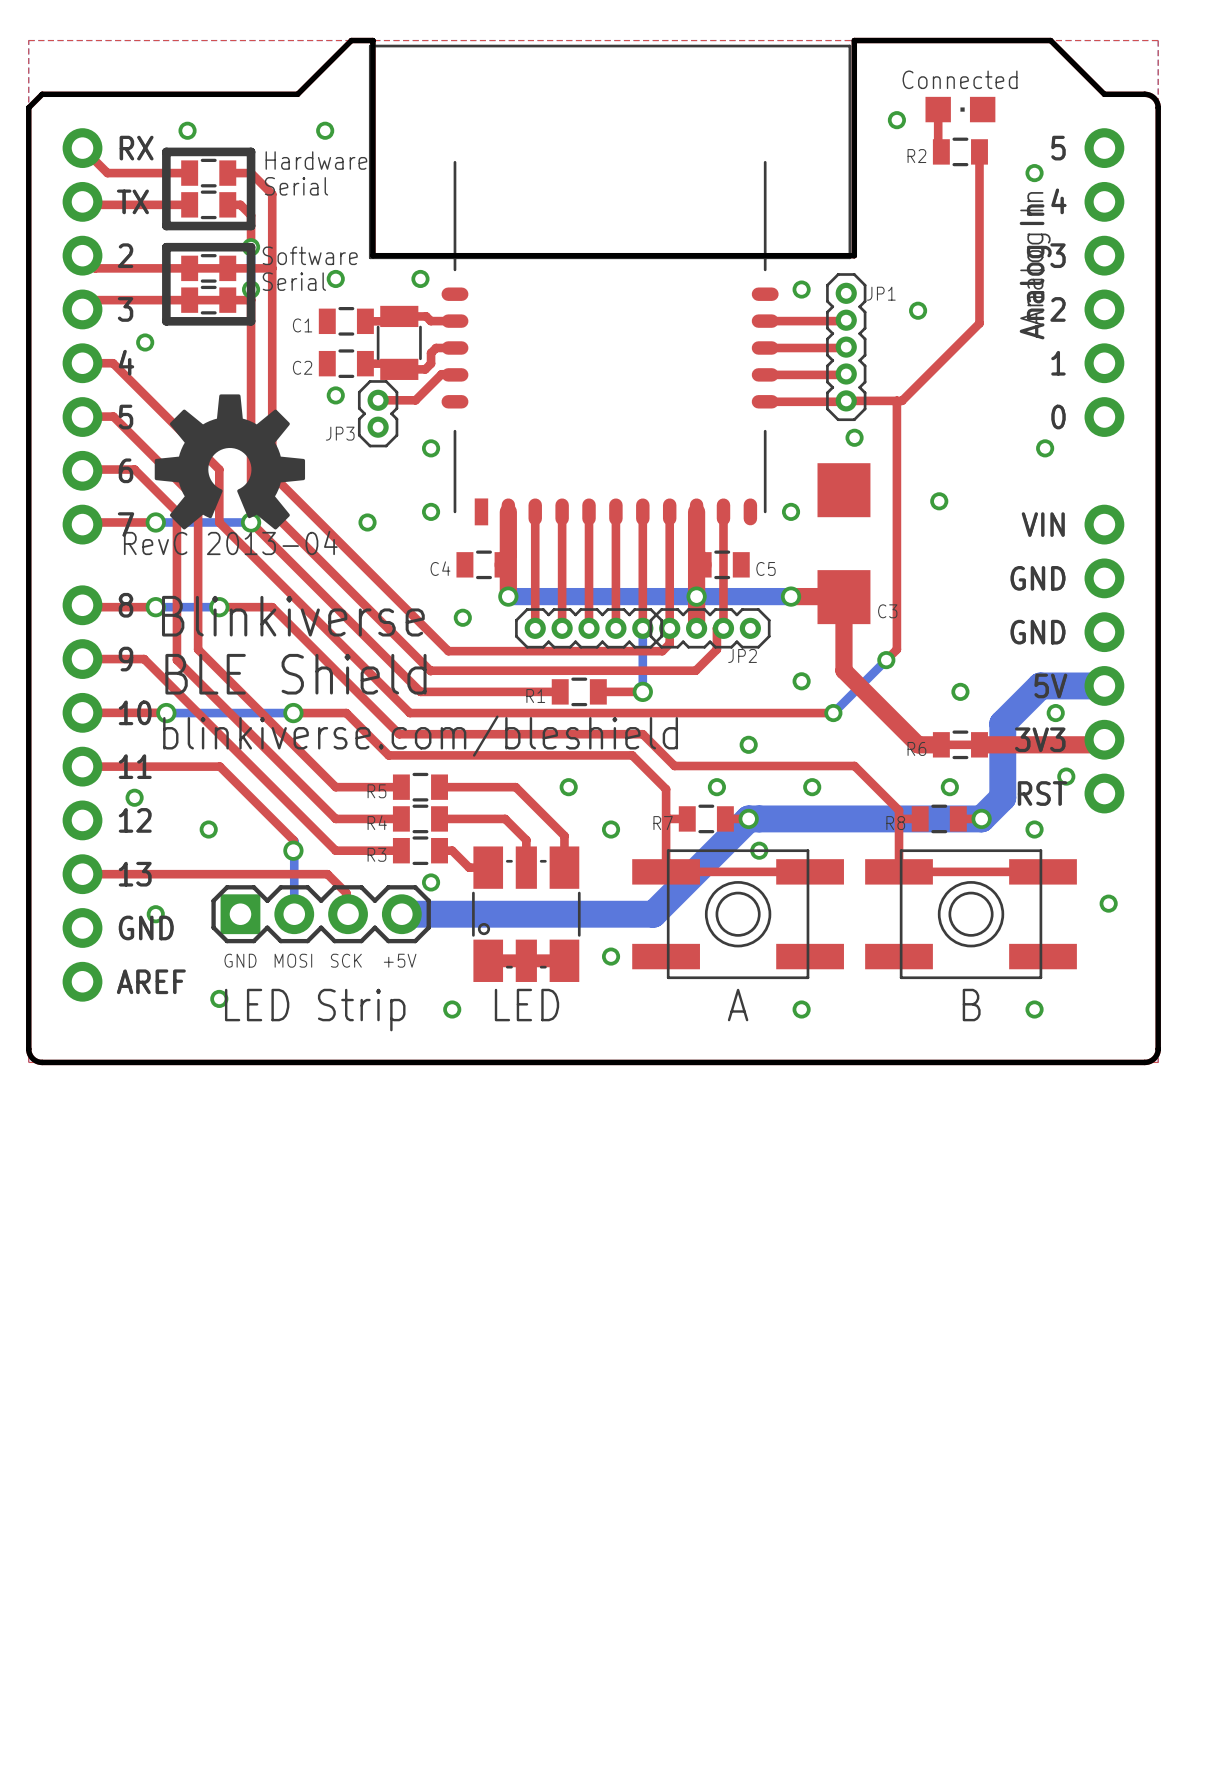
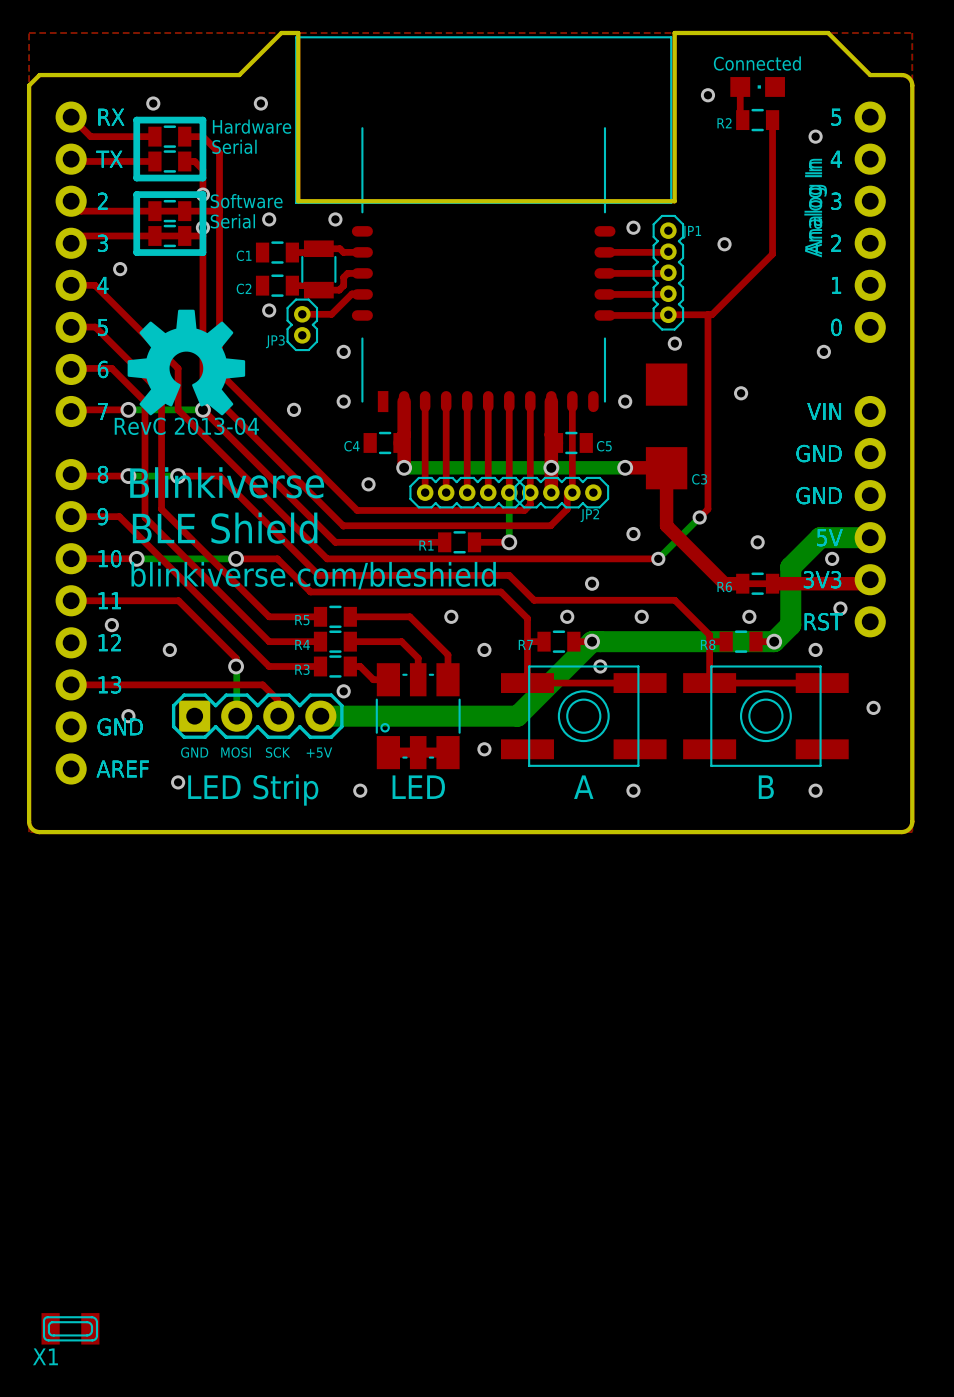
X1: none -> (70, 1328)

